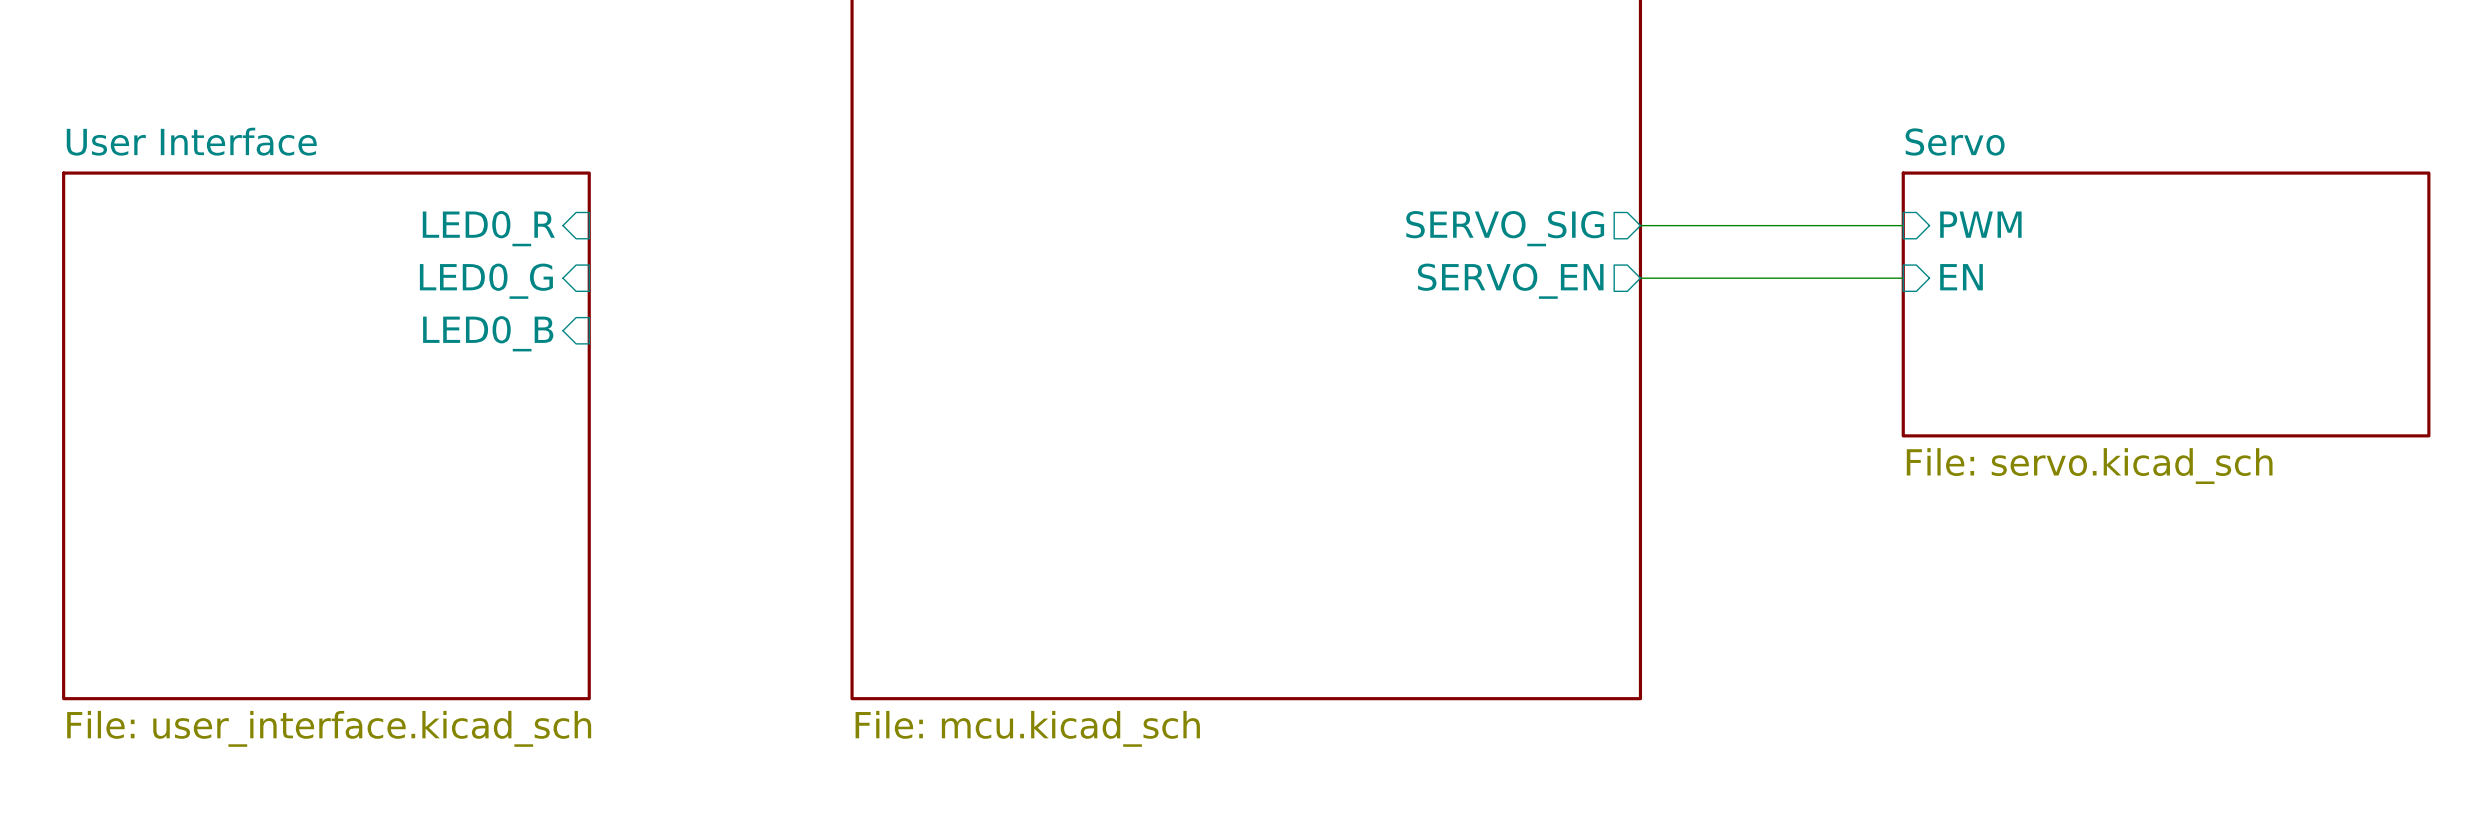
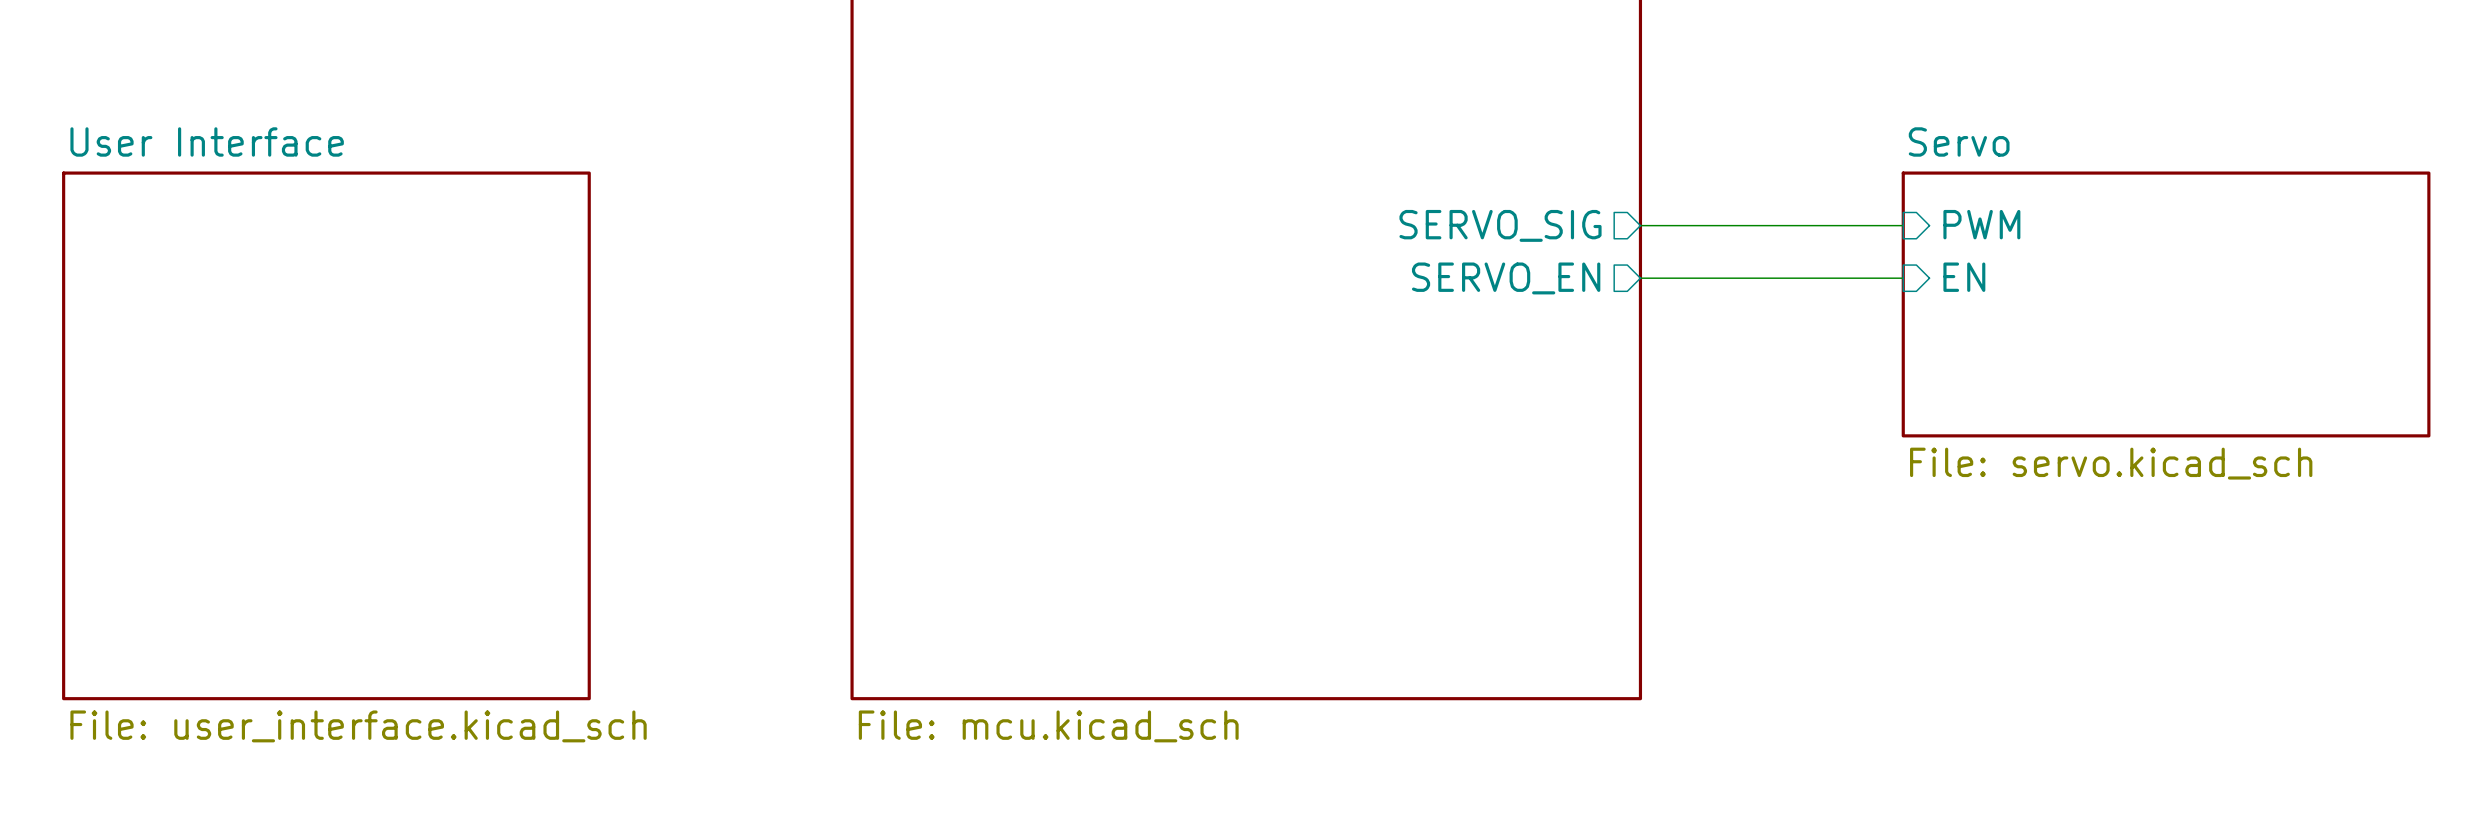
sheet pin: LED0_R (488, 228) -> none
sheet pin: LED0_G (486, 281) -> none
sheet pin: LED0_B (488, 333) -> none

